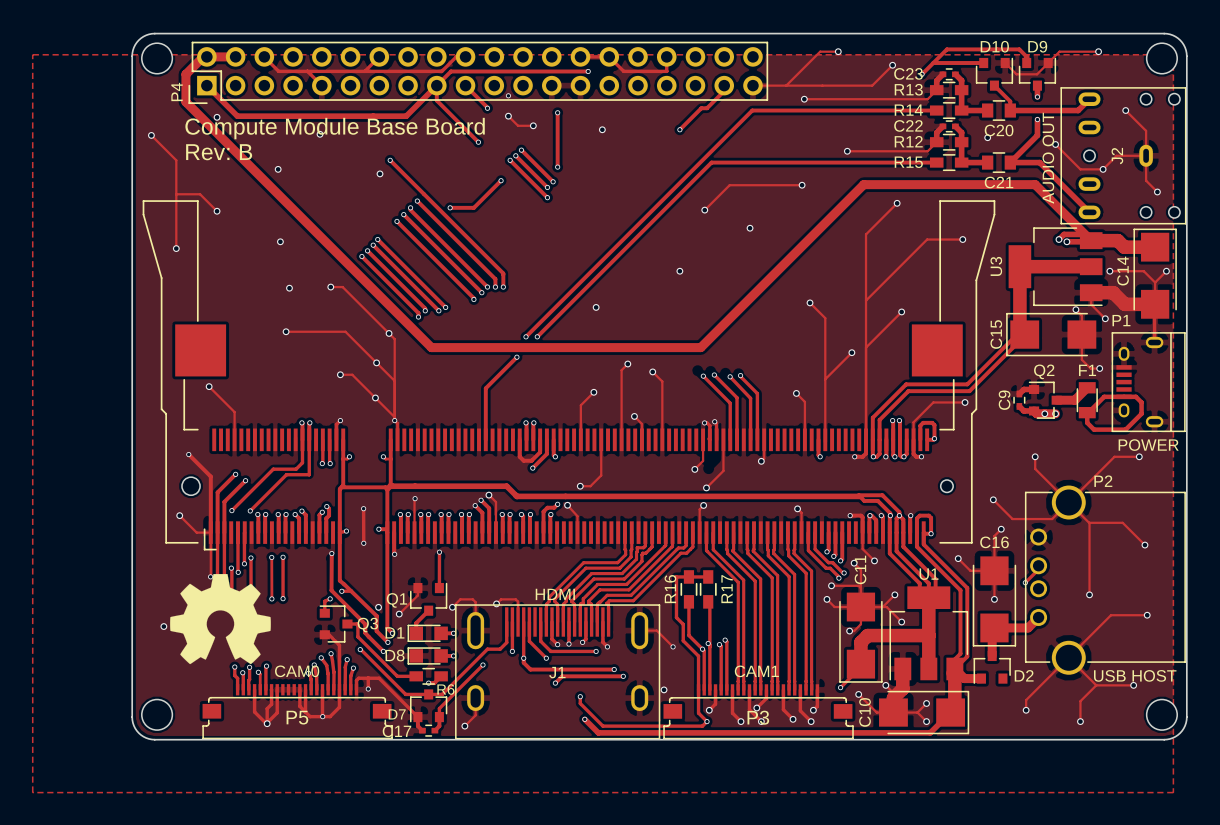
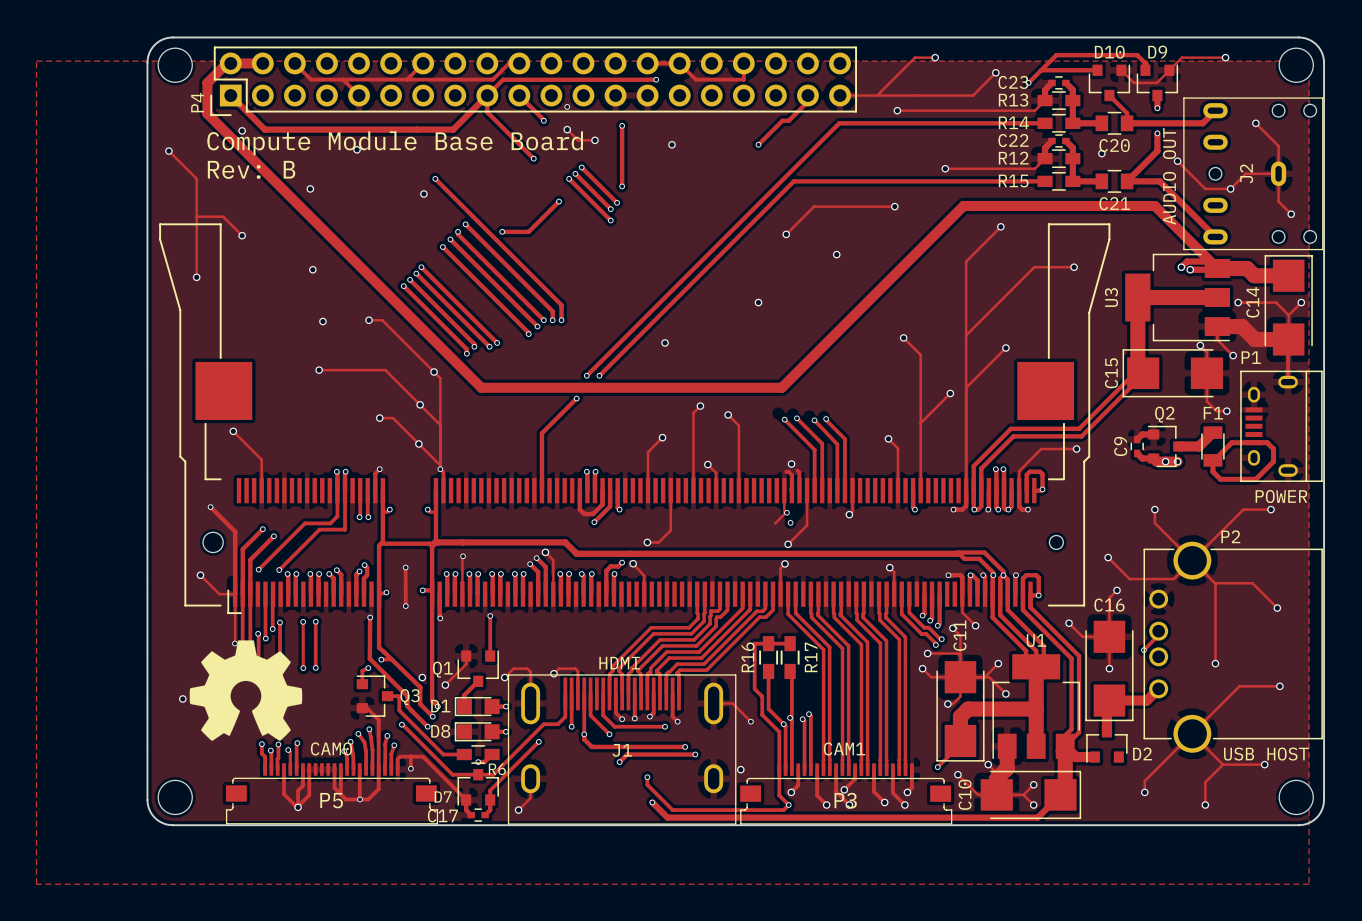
via: (714, 421) -> none
via: (704, 422) -> none
via: none -> (786, 512)
via: none -> (790, 522)
via position: (694, 469) -> (791, 464)

